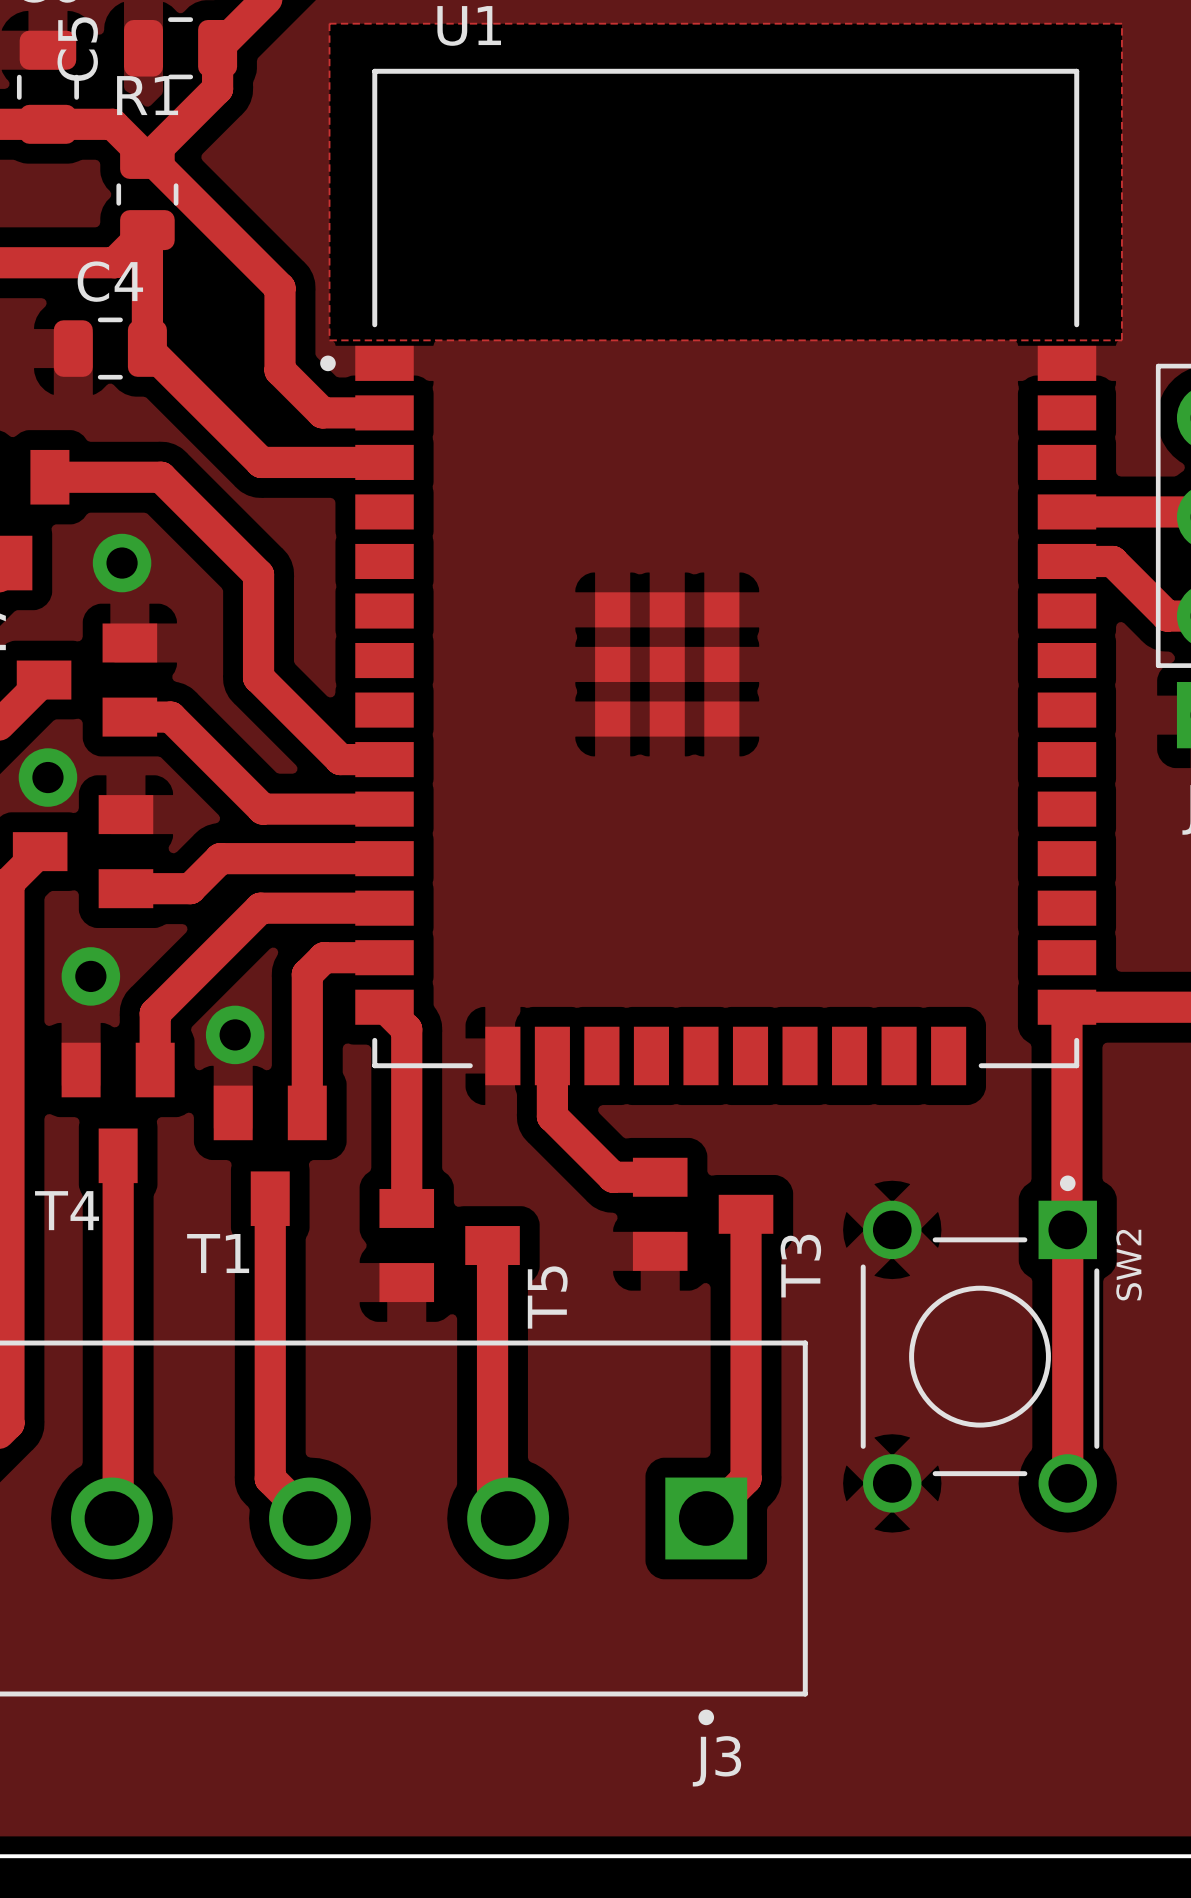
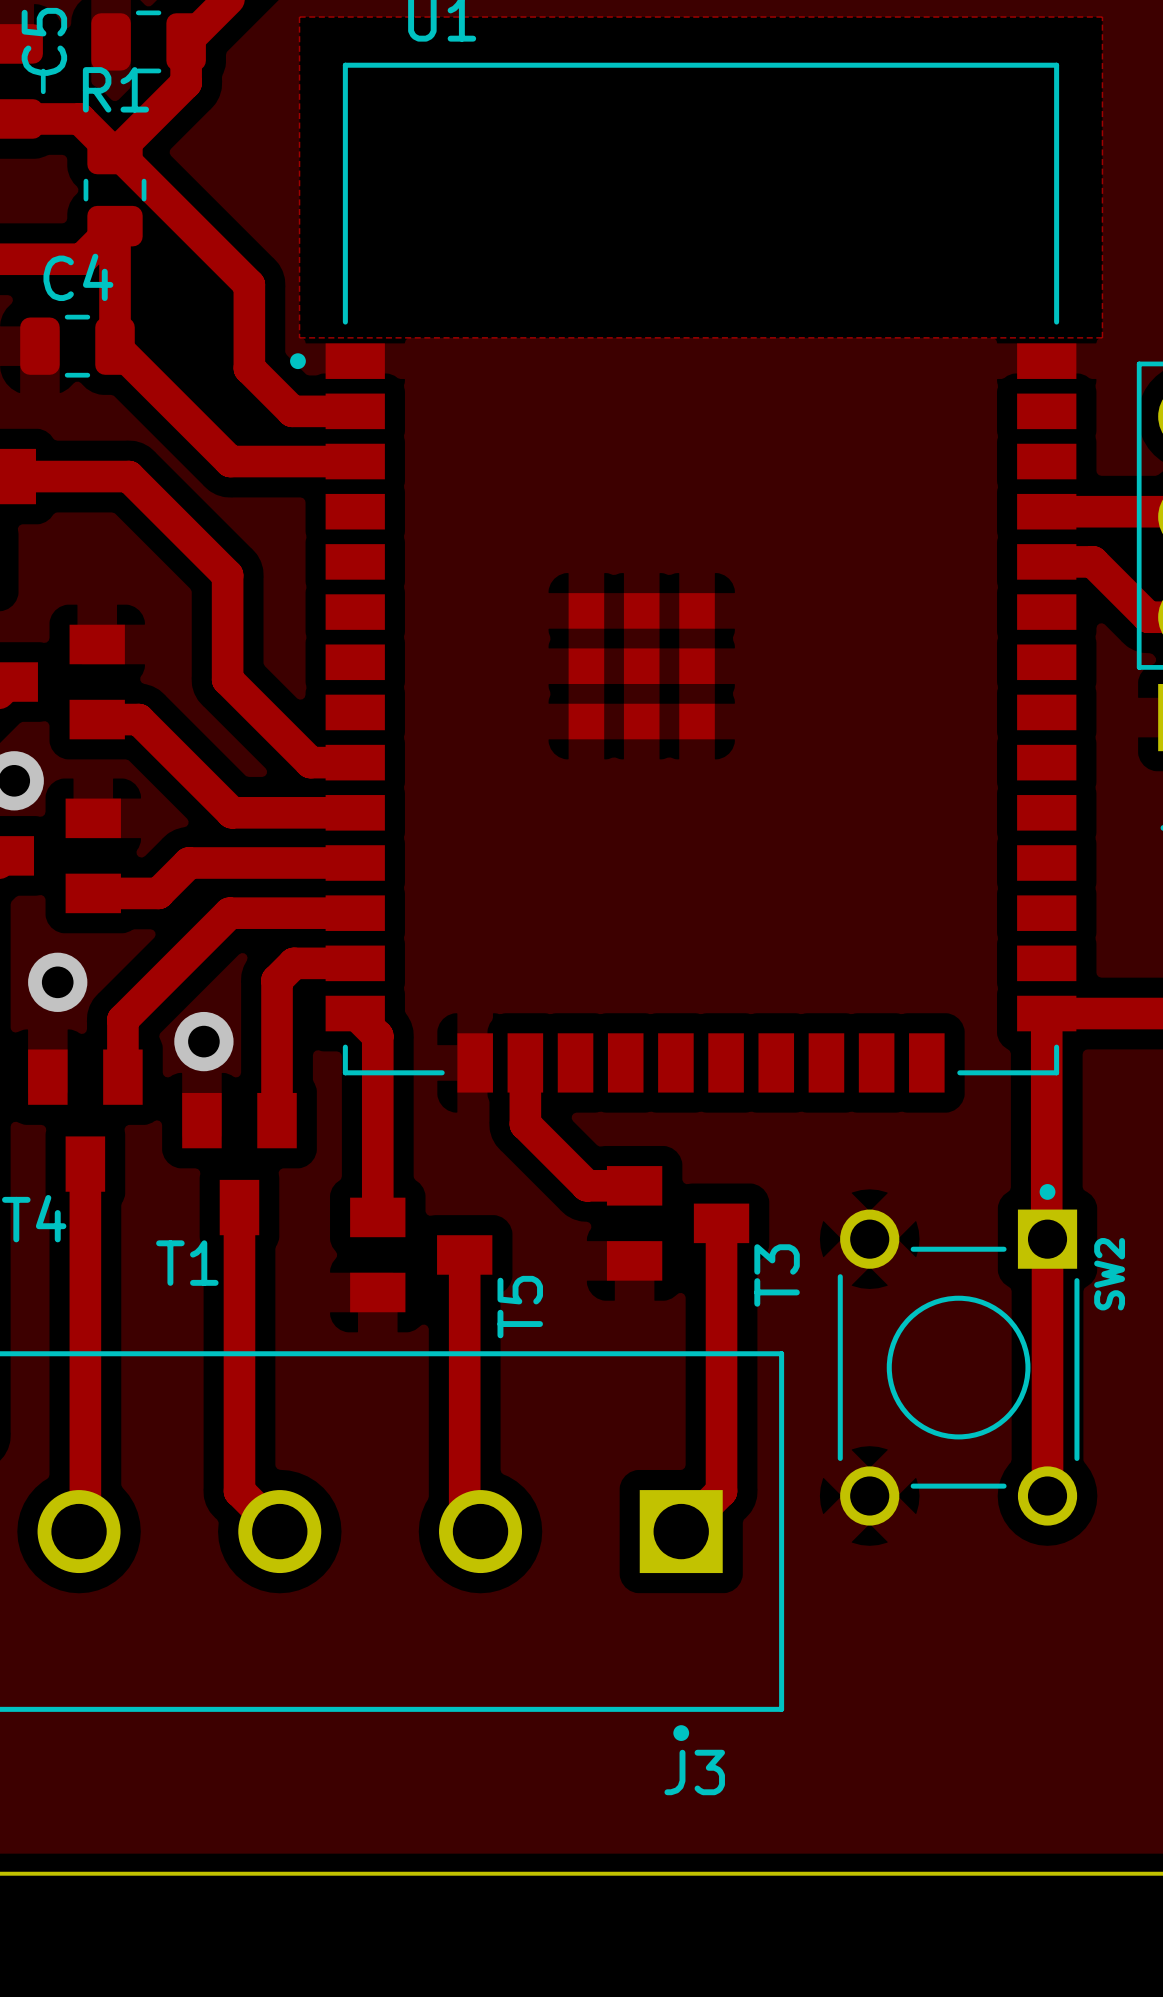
via: (122, 563) -> none

